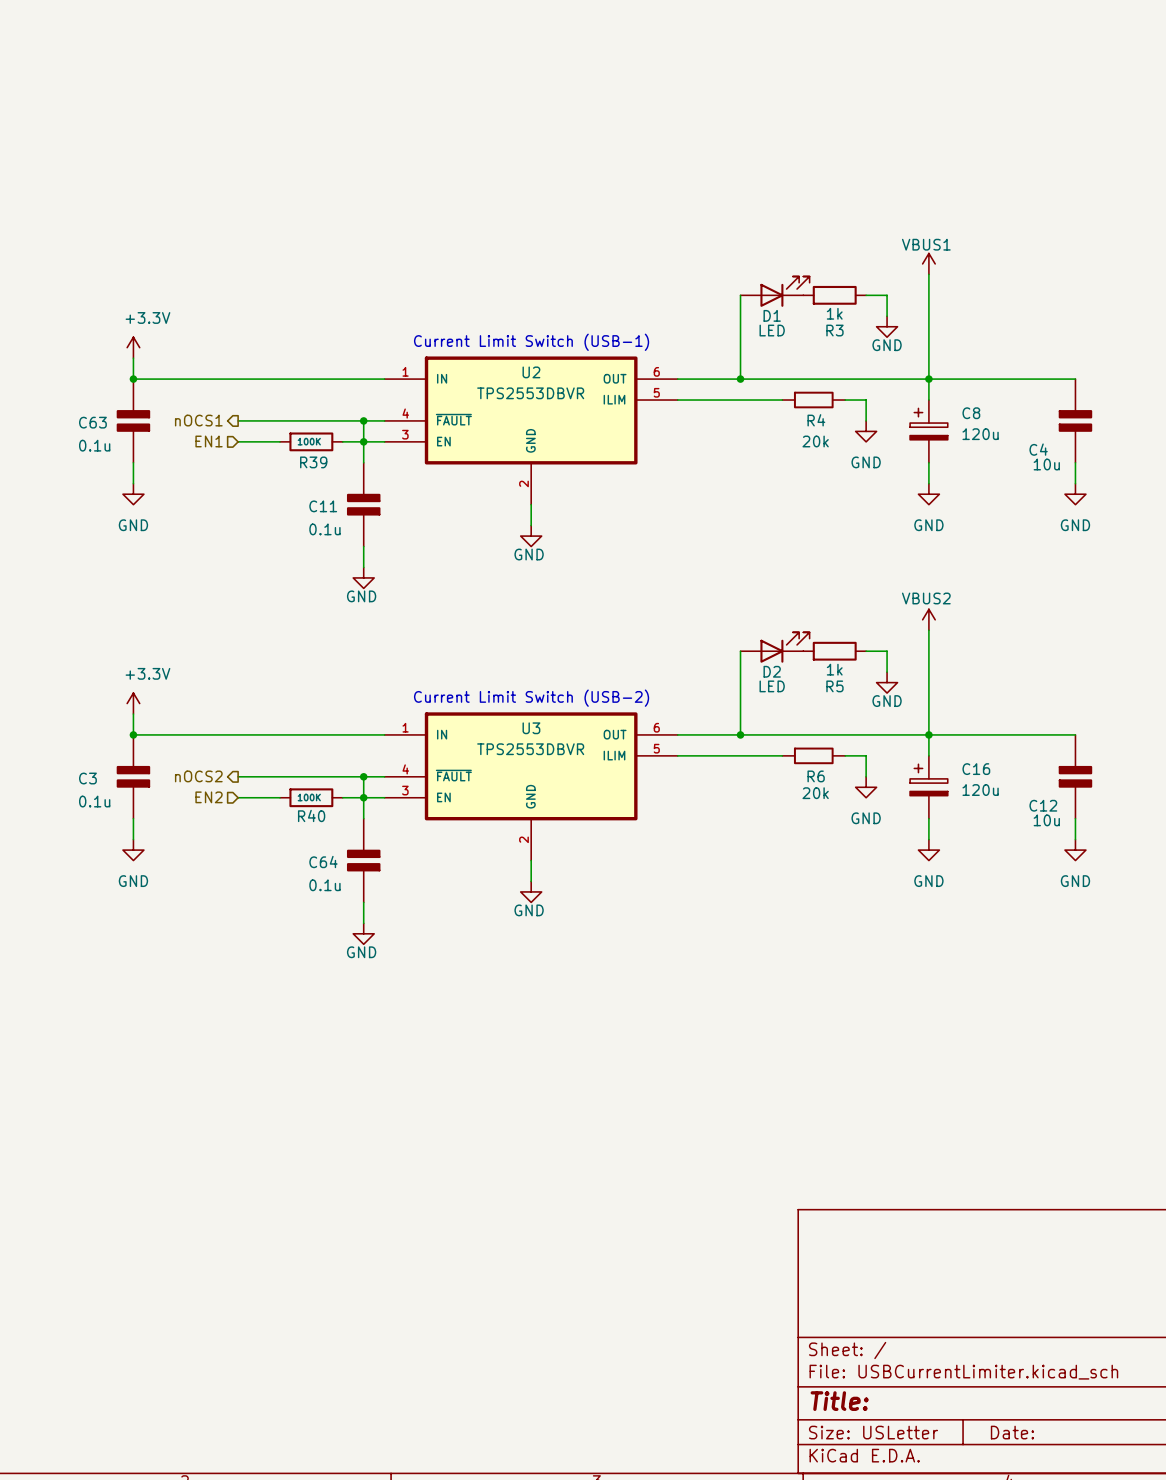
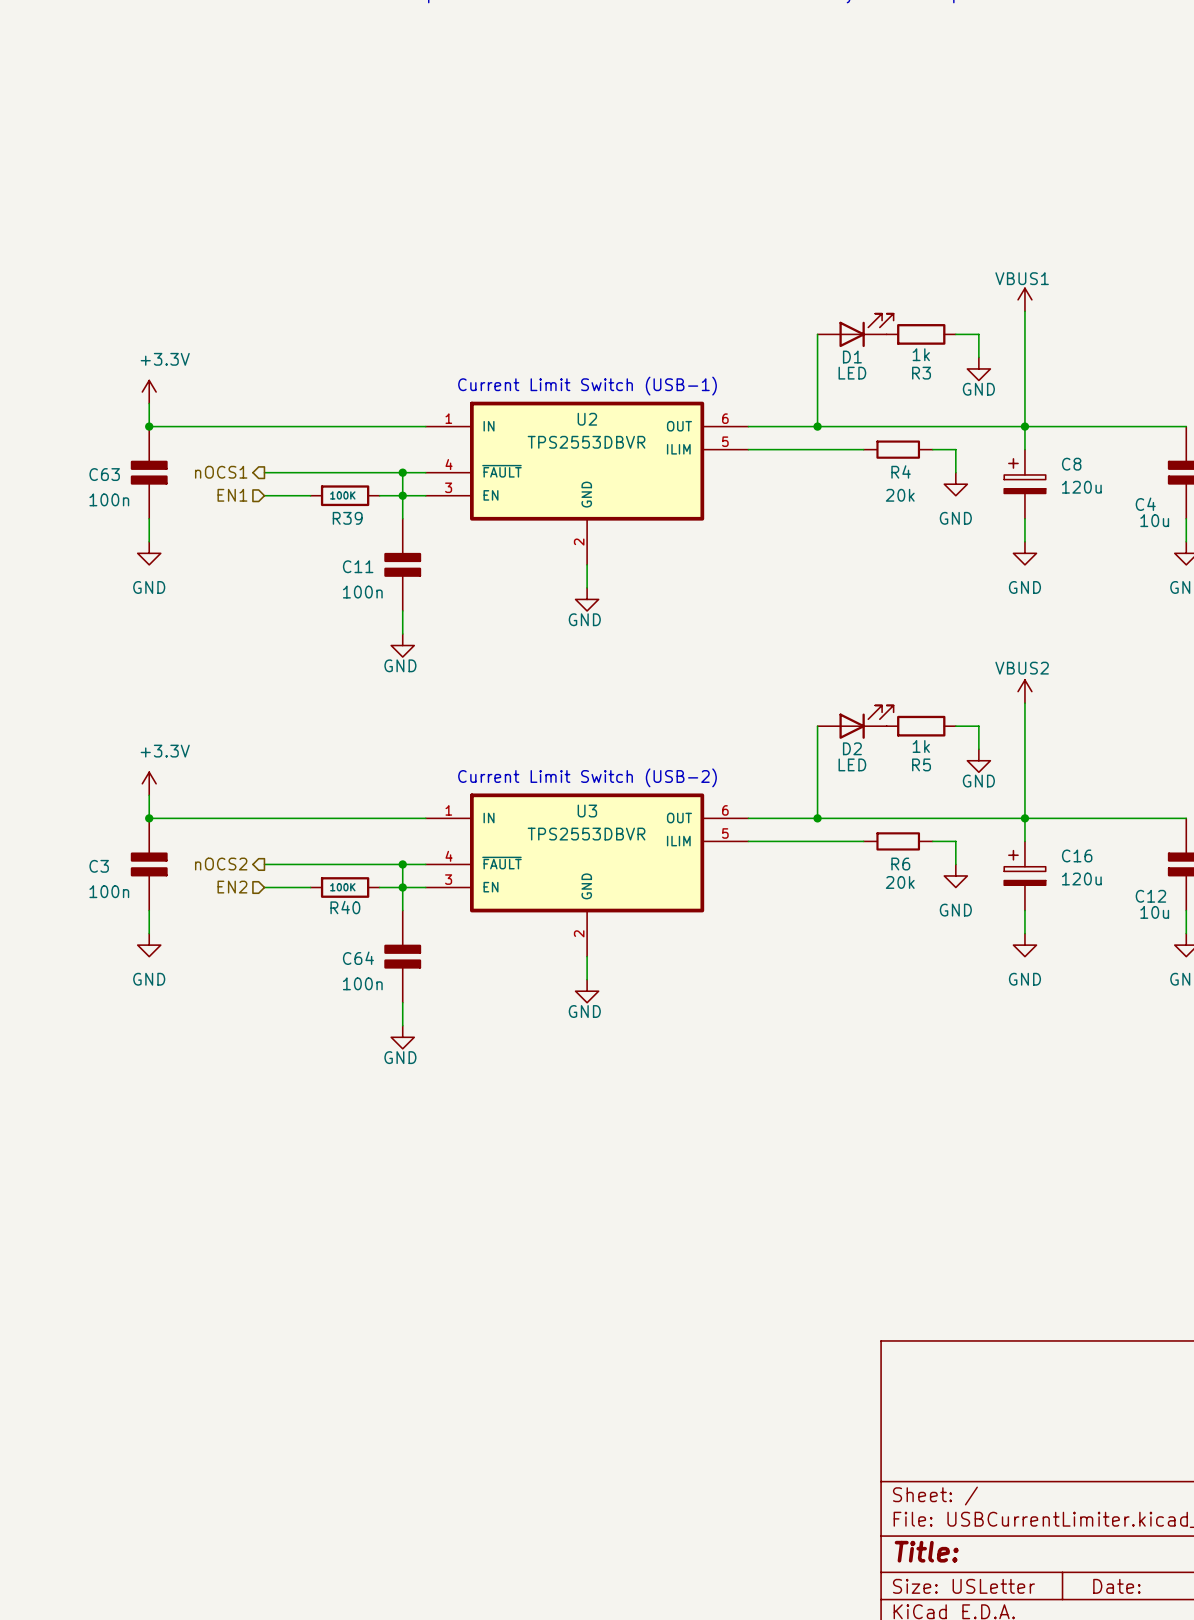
C63 value: 0.1u (94, 445) -> 100n (109, 499)
C11 value: 0.1u (324, 529) -> 100n (362, 592)
C3 value: 0.1u (94, 801) -> 100n (109, 891)
C64 value: 0.1u (324, 885) -> 100n (362, 983)

